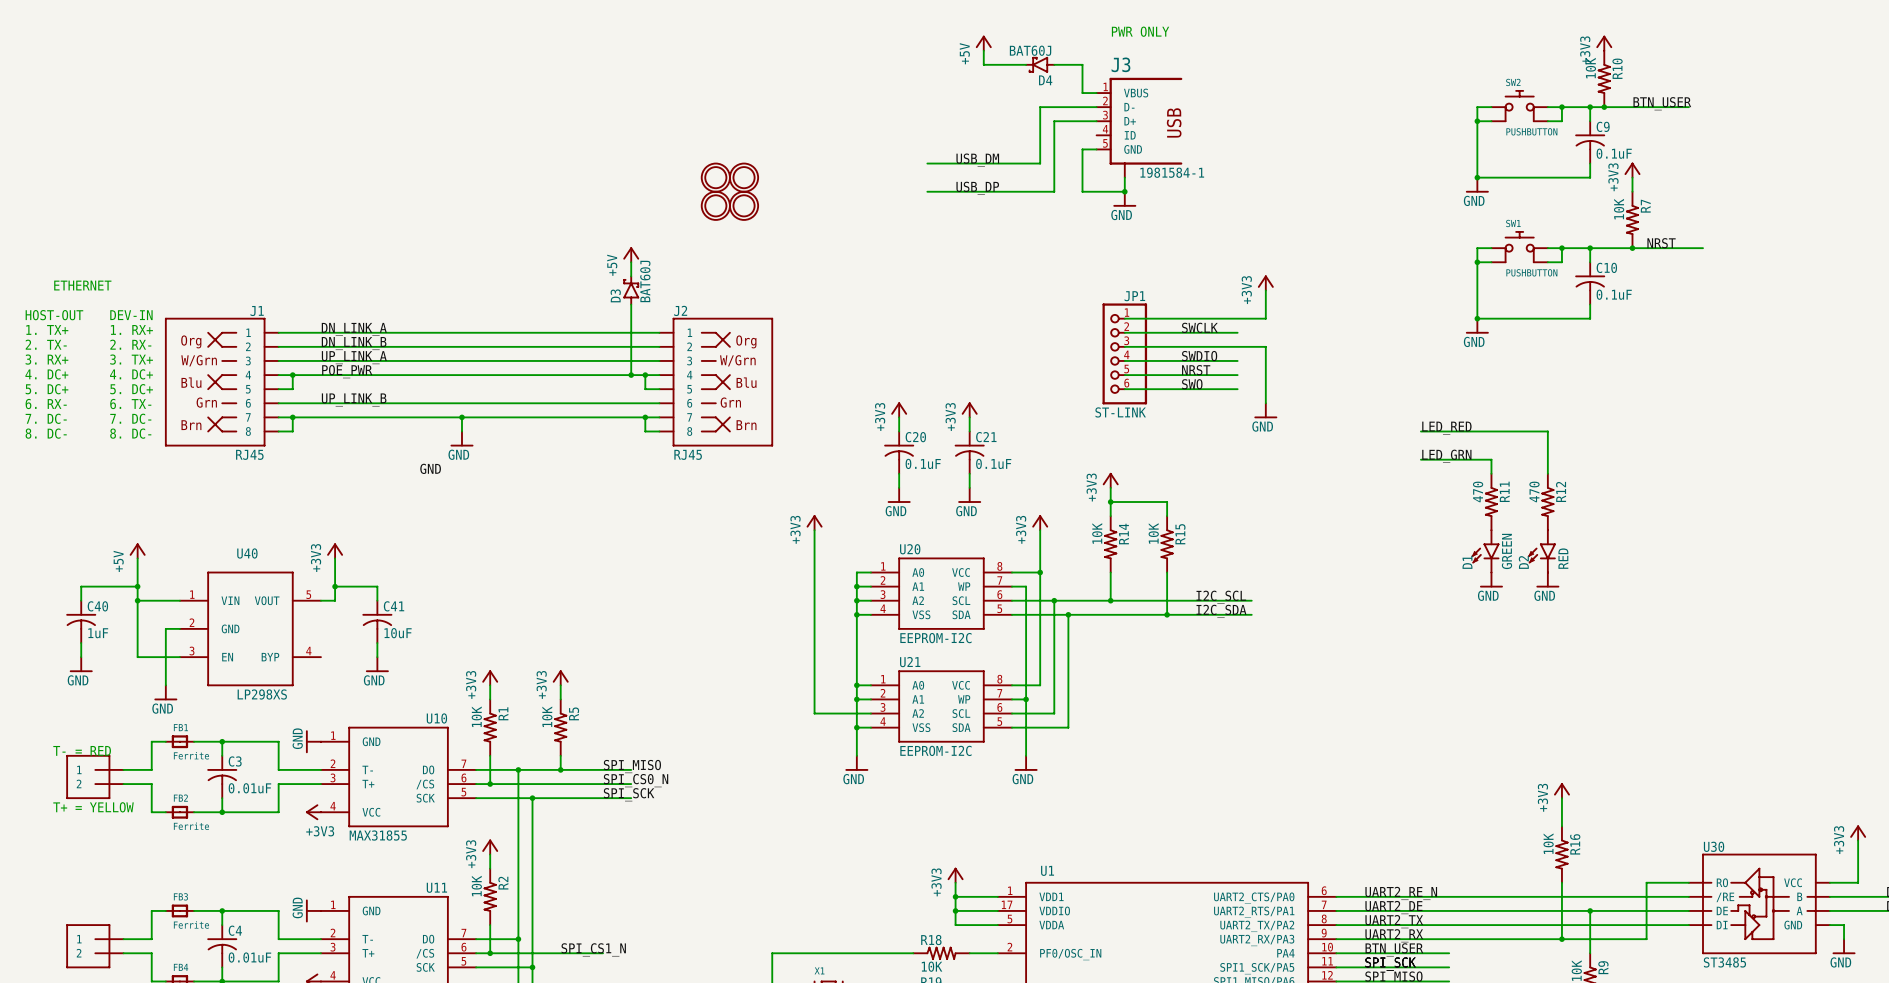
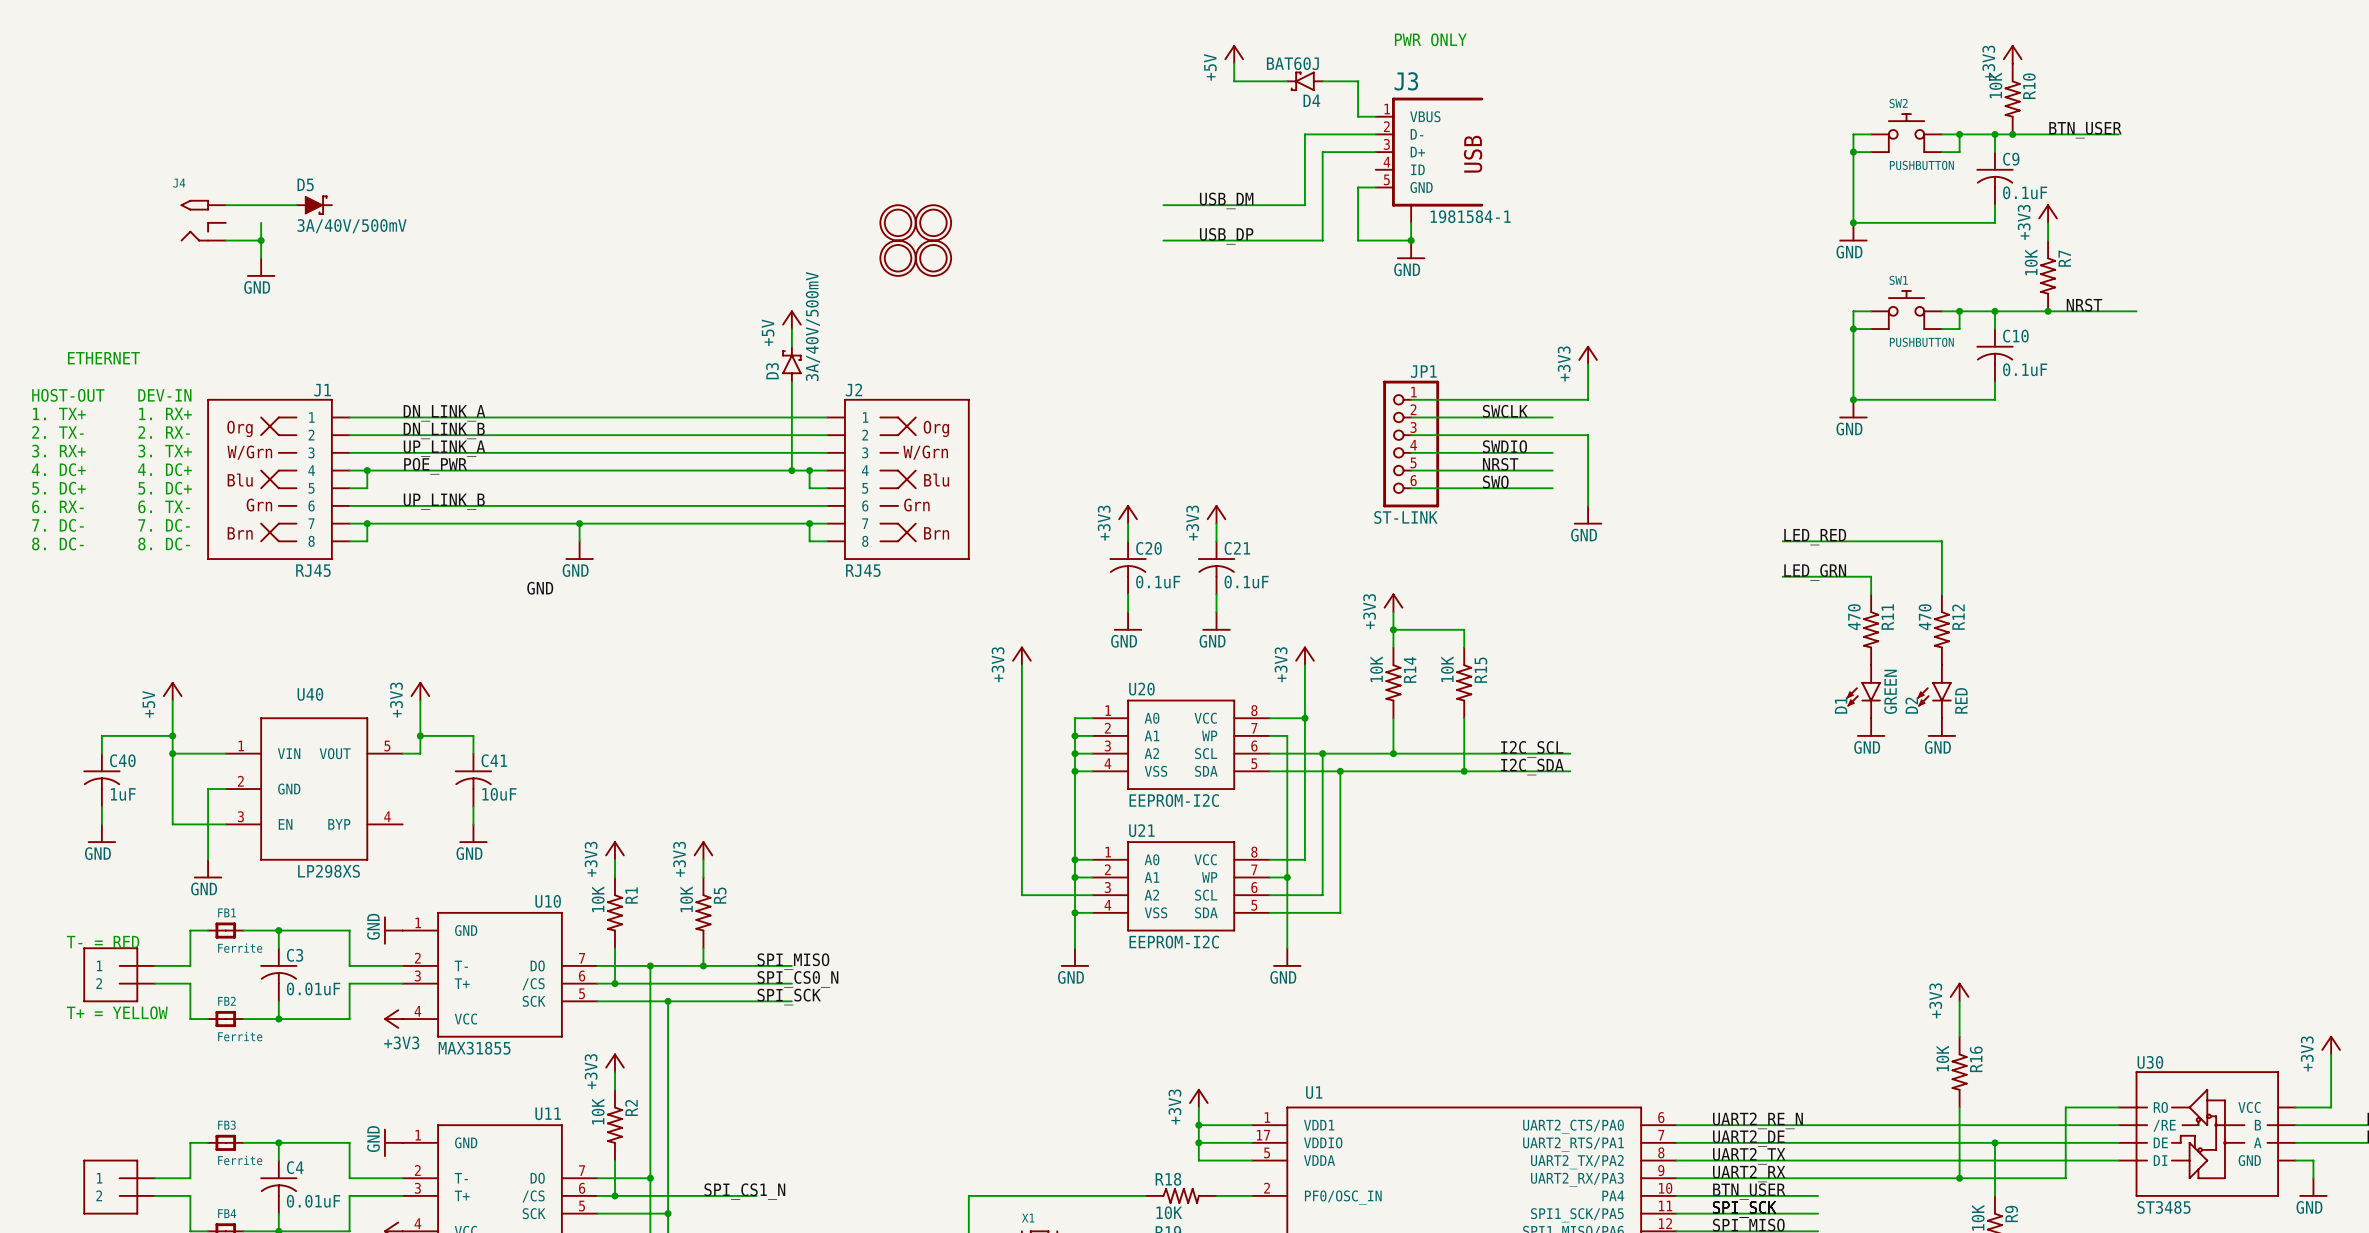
wire: none -> (225, 205) (296, 205)
D5: none -> 3A/40V/500mV (314, 205)
J4: none -> (203, 220)
wire: none -> (261, 222) (261, 258)
wire: none -> (225, 240) (261, 240)
junction: none -> (261, 240)
power symbol: none -> GND (261, 267)
D3 value: BAT60J (645, 281) -> 3A/40V/500mV (812, 326)

